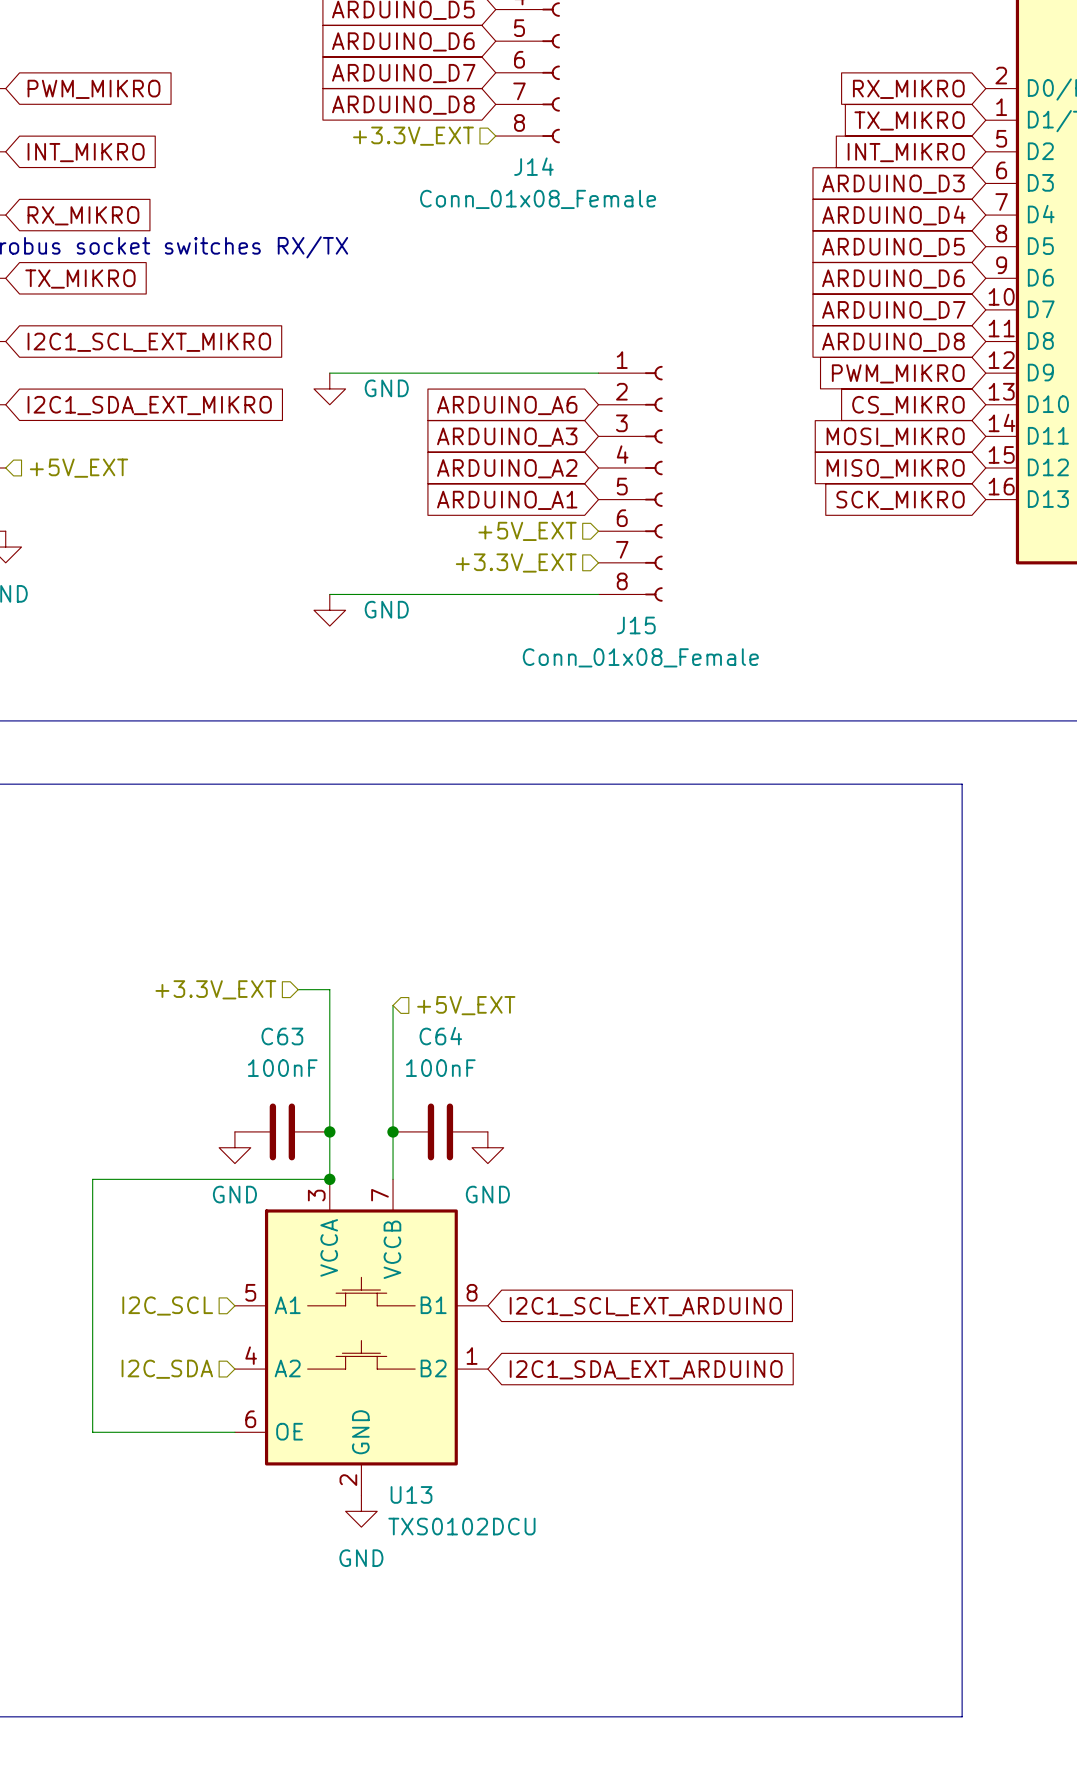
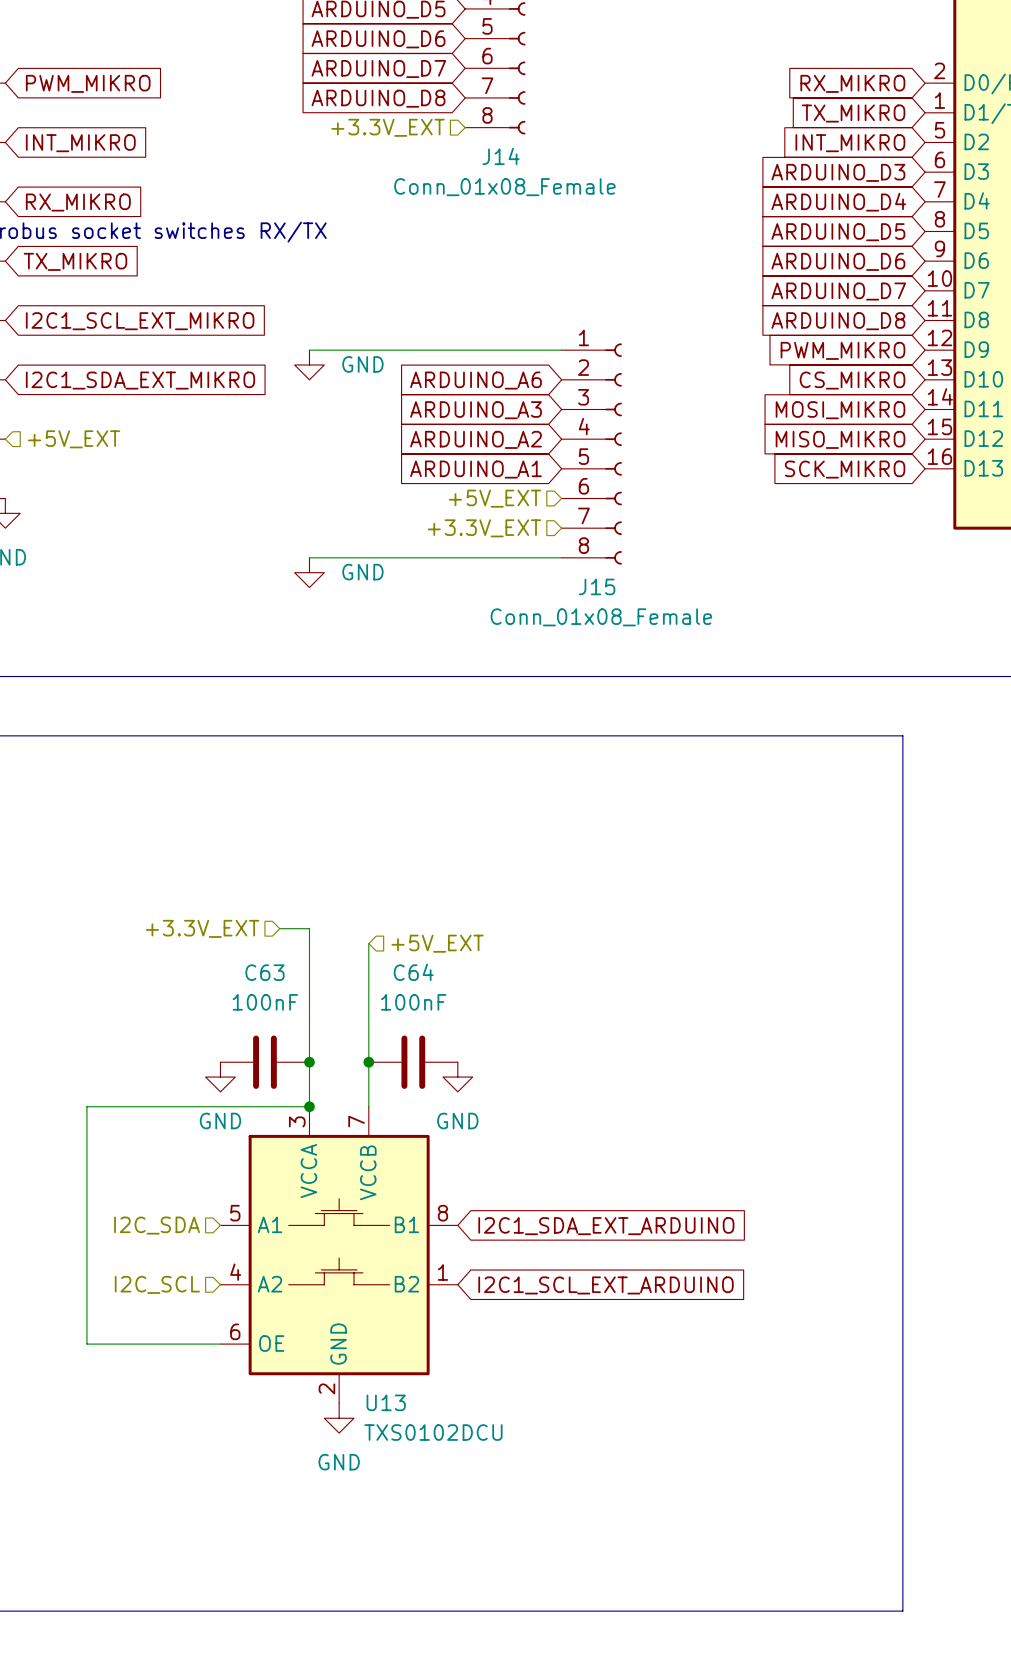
hierarchical label: I2C_SCL (167, 1305) -> I2C_SDA (157, 1225)
global label: I2C1_SCL_EXT_ARDUINO (645, 1306) -> I2C1_SDA_EXT_ARDUINO (606, 1226)
hierarchical label: I2C_SDA (167, 1369) -> I2C_SCL (157, 1284)
global label: I2C1_SDA_EXT_ARDUINO (646, 1369) -> I2C1_SCL_EXT_ARDUINO (606, 1285)

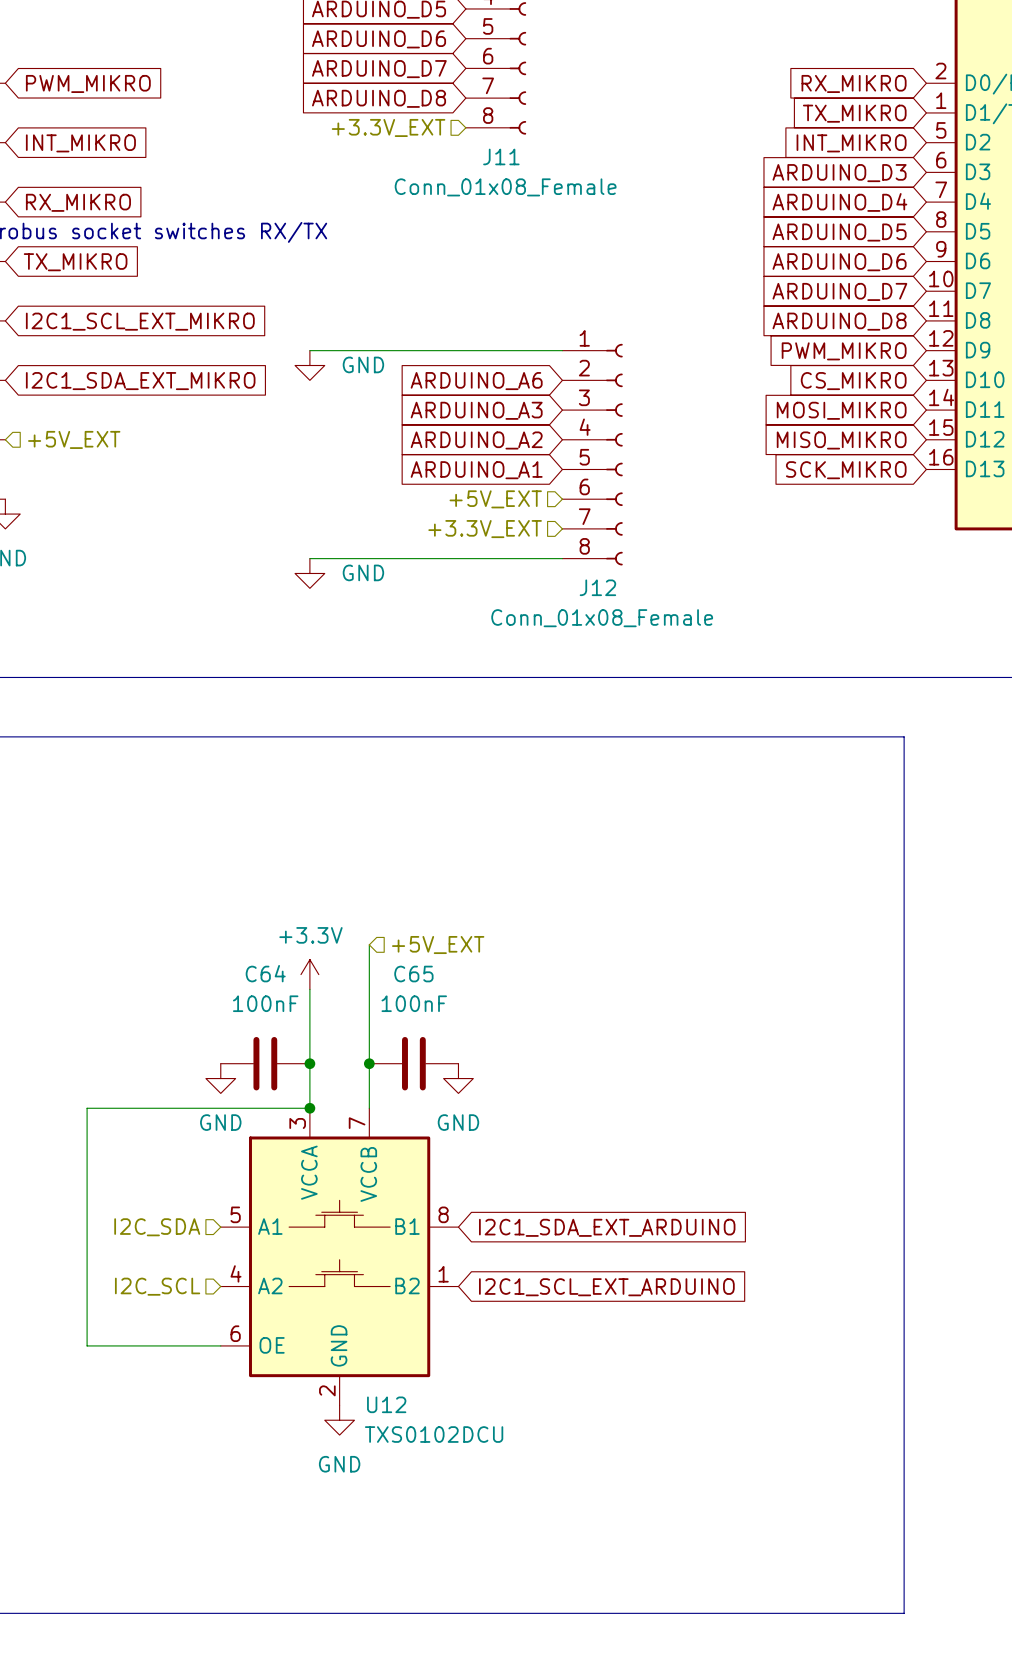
J14 name: J14 (501, 156) -> J11 (501, 156)
J15 name: J15 (597, 586) -> J12 (597, 587)
hierarchical label: +3.3V_EXT (202, 928) -> none
wire: (279, 928) (309, 928) (309, 988) -> none
C63 name: C63 (264, 972) -> C64 (265, 973)
C64 name: C64 (413, 972) -> C65 (413, 974)
power symbol: none -> +3.3V (309, 974)
U13 name: U13 (386, 1402) -> U12 (386, 1404)

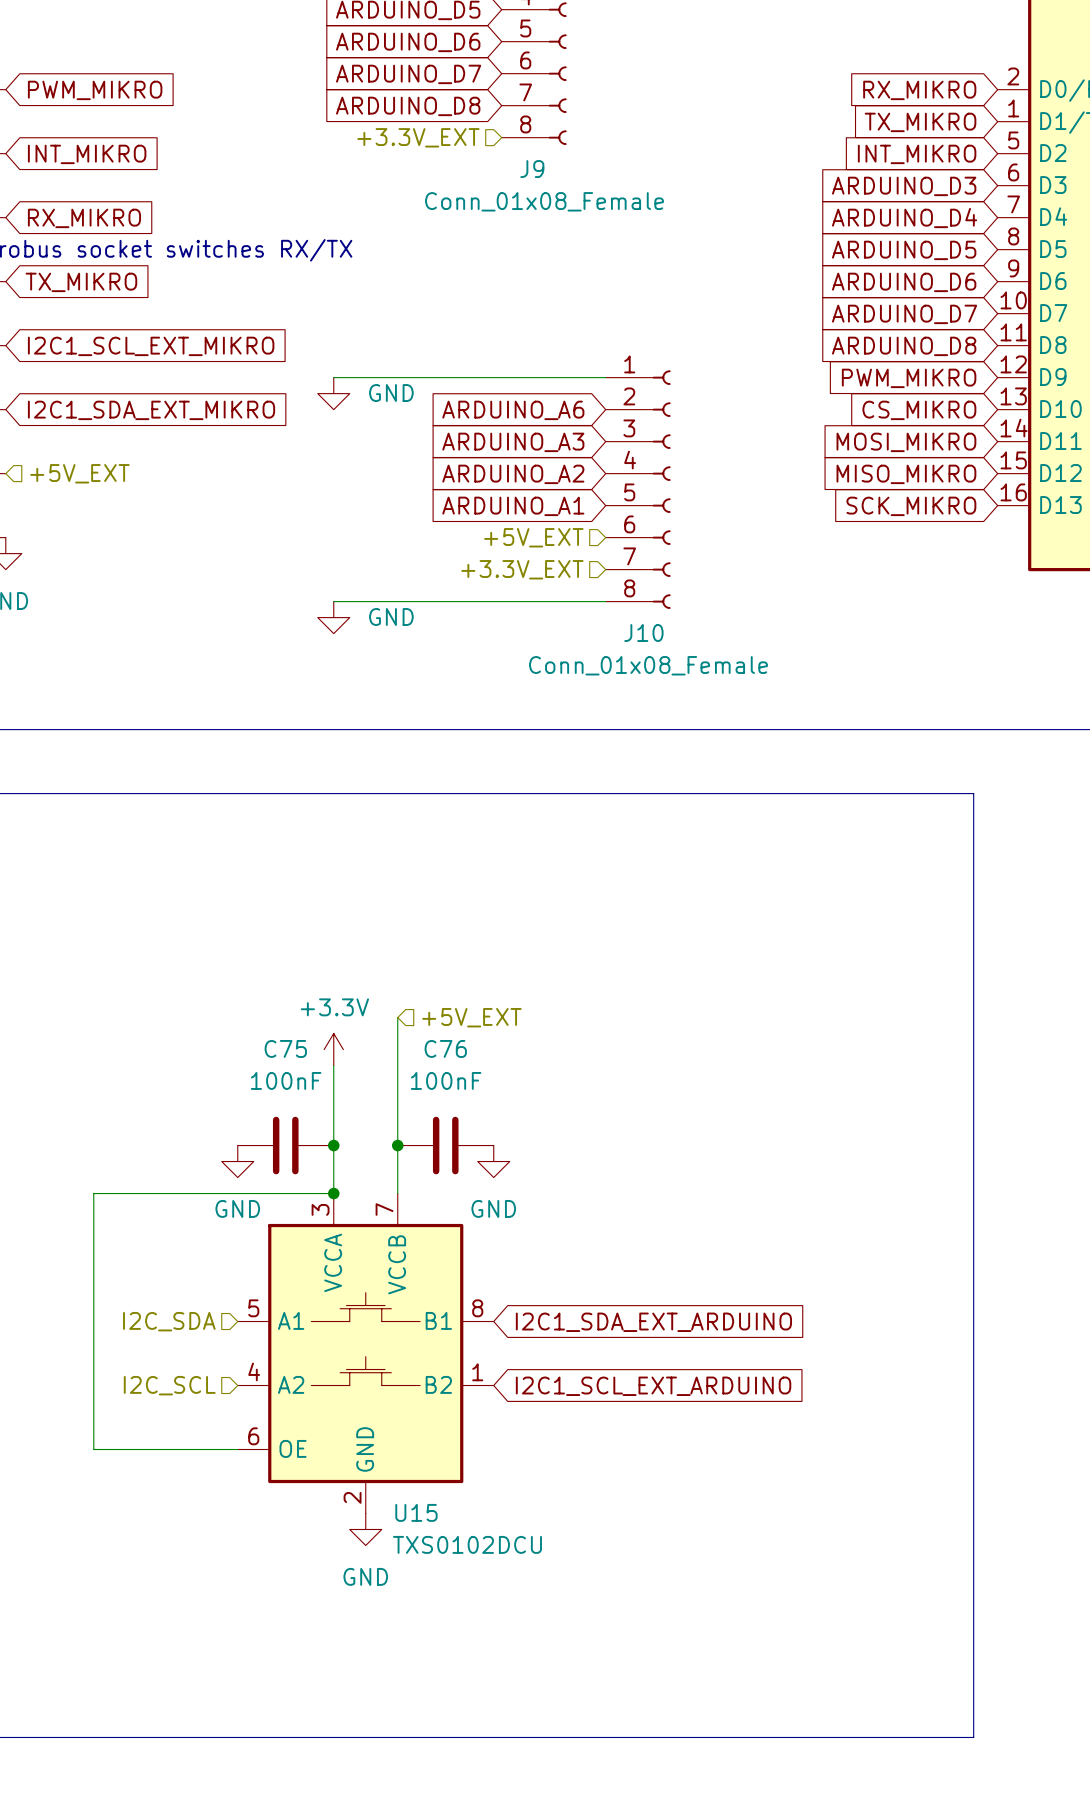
J11 name: J11 (501, 156) -> J9 (532, 169)
J12 name: J12 (597, 587) -> J10 (643, 633)
C64 name: C64 (265, 973) -> C75 (285, 1048)
C65 name: C65 (413, 974) -> C76 (445, 1048)
U12 name: U12 (386, 1404) -> U15 (416, 1512)

